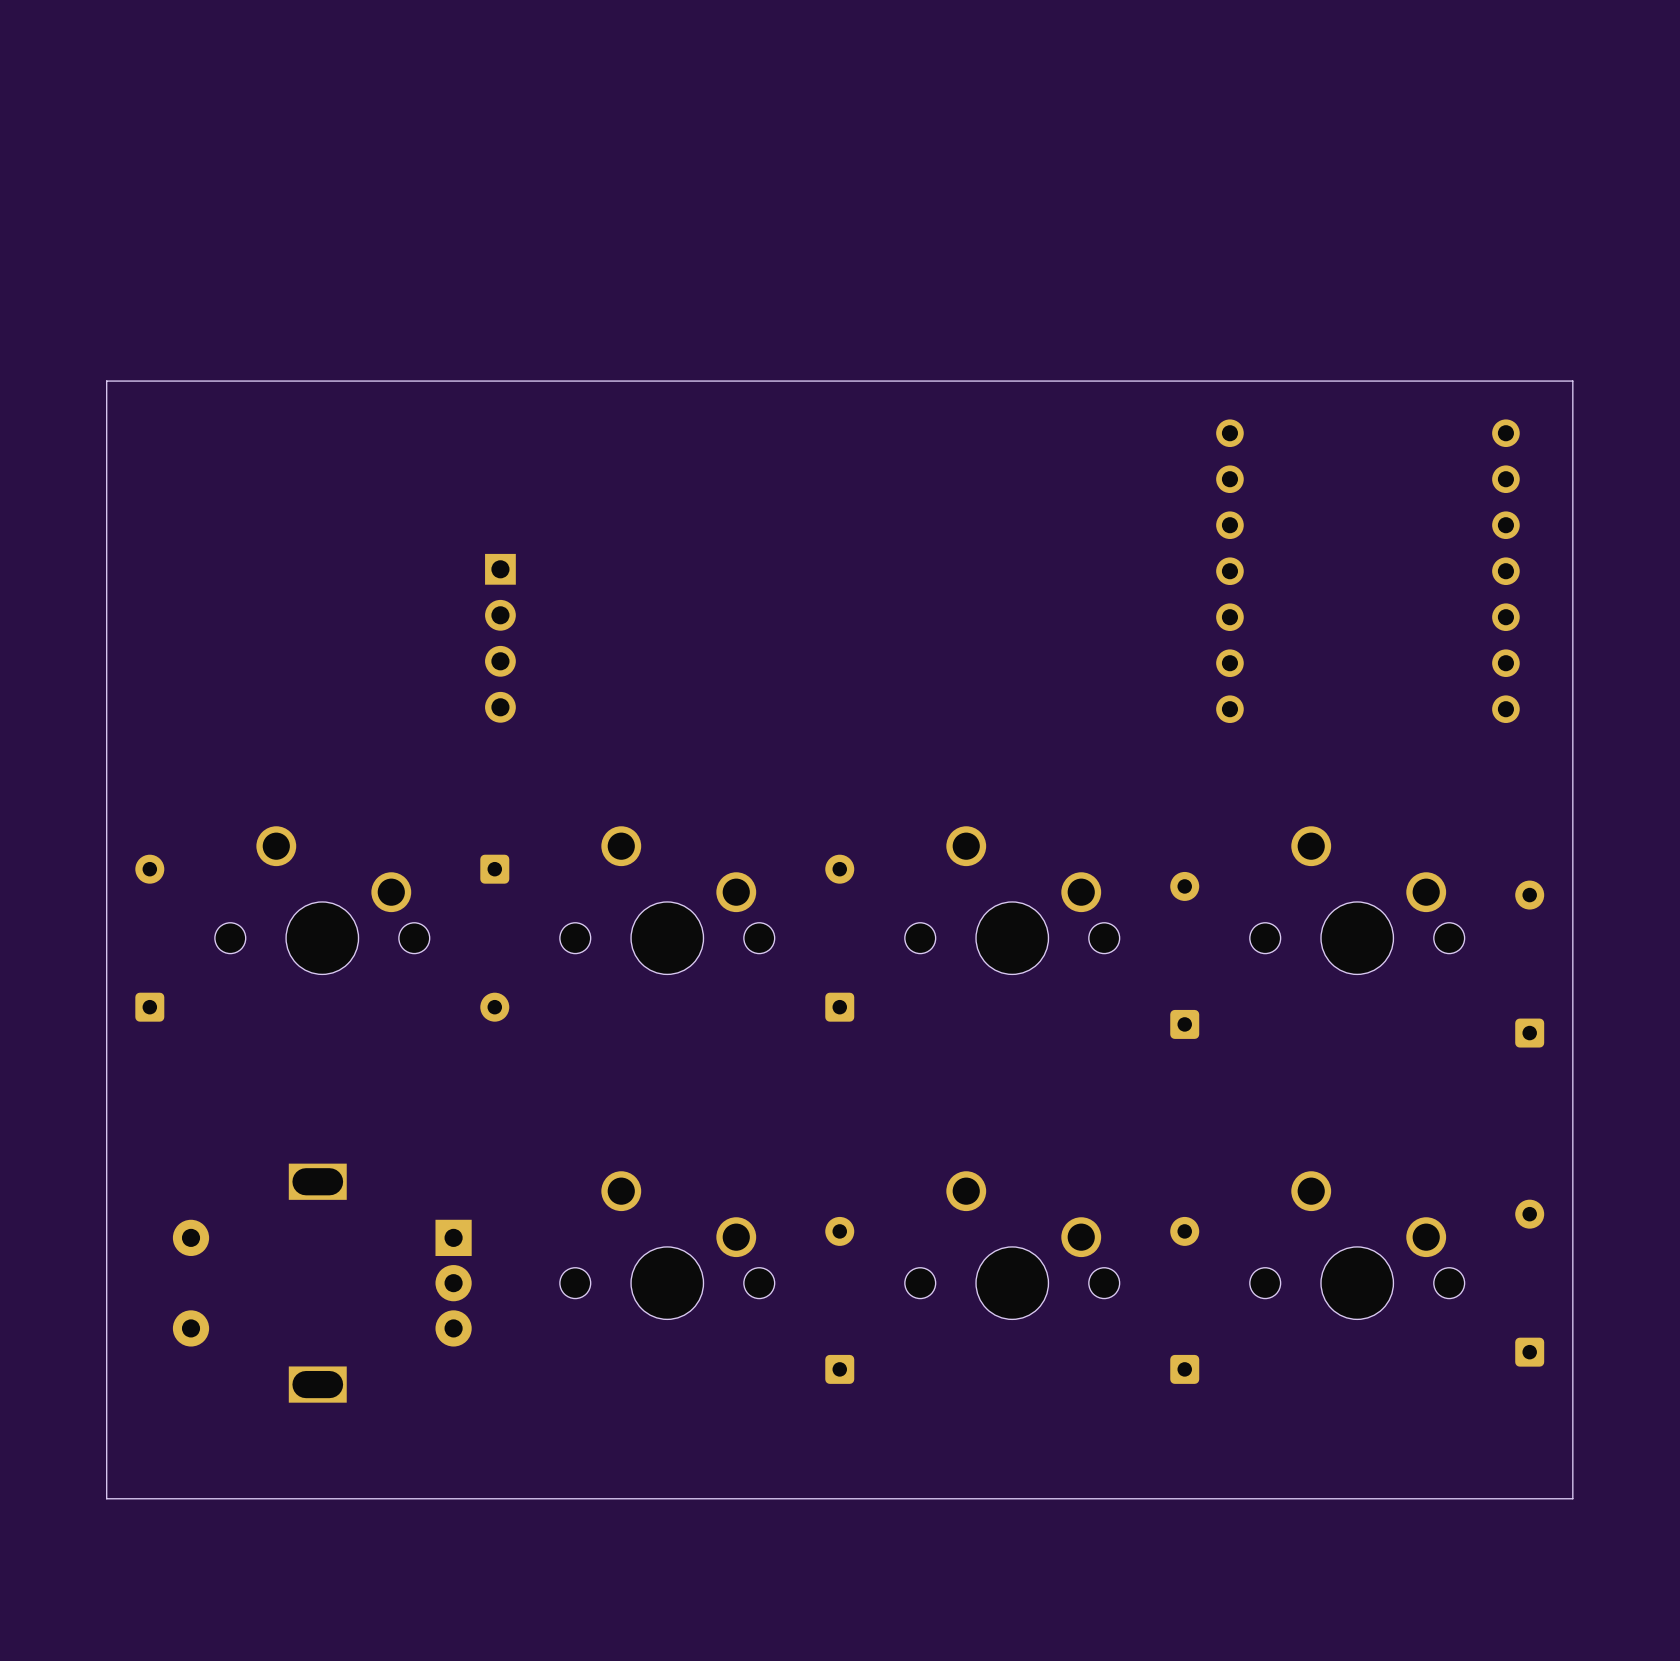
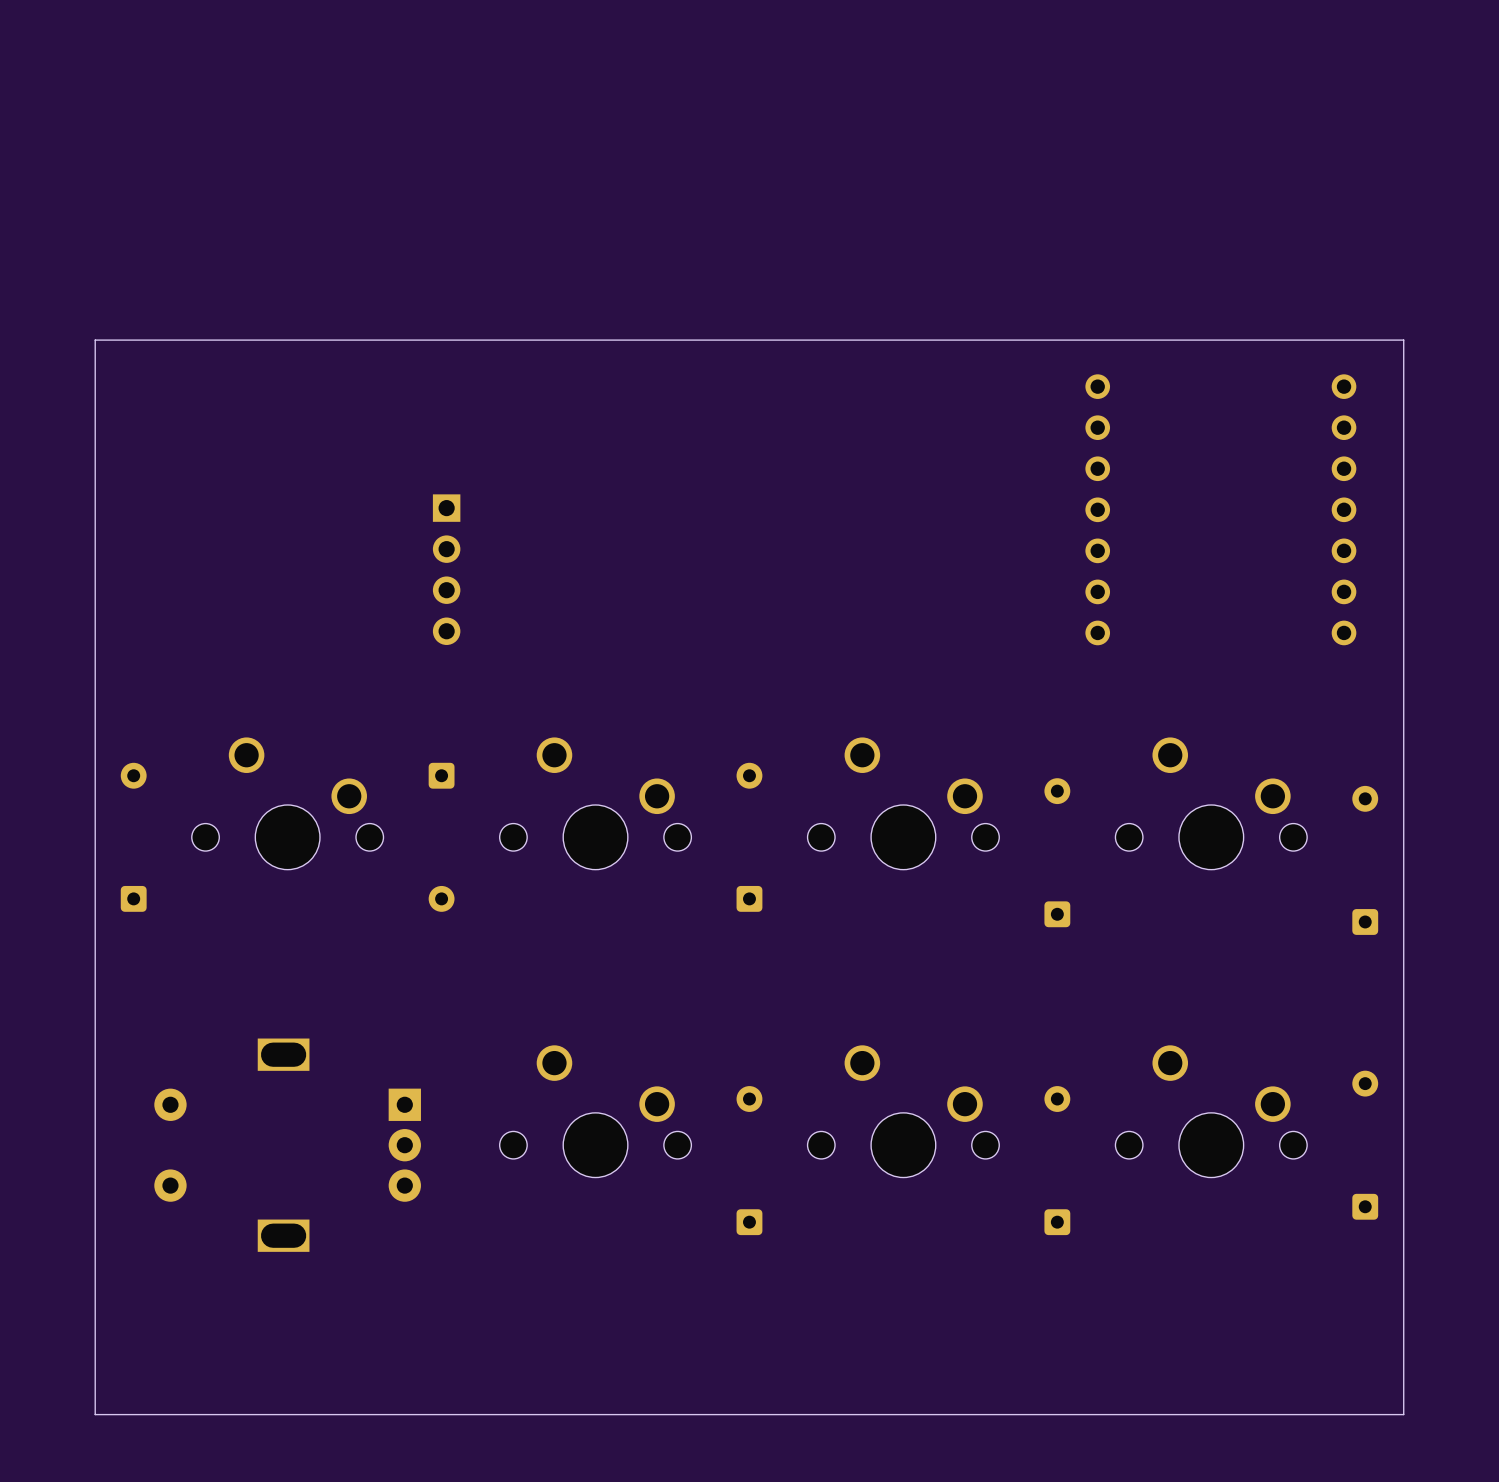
board edge: (1572, 1498) (106, 1498) -> (1403, 1337) (1403, 1414) (95, 1414) (95, 1337)

